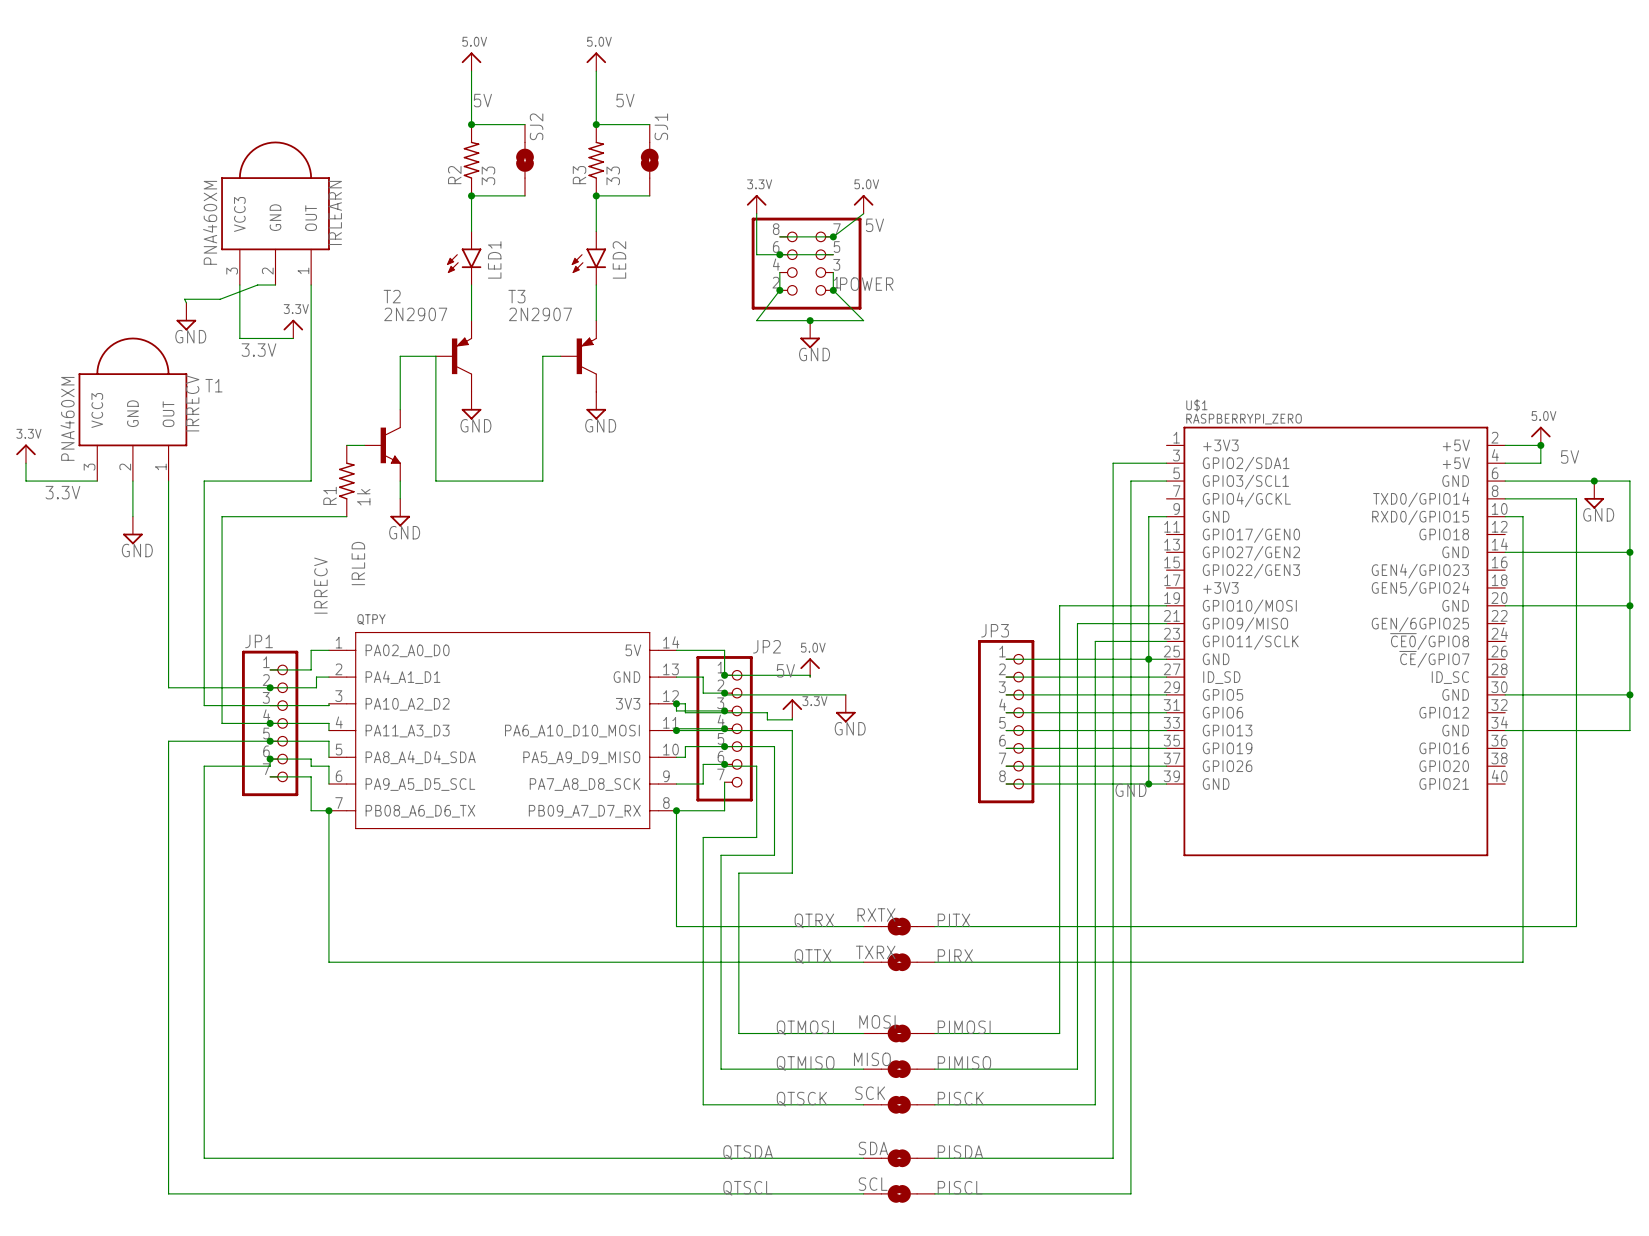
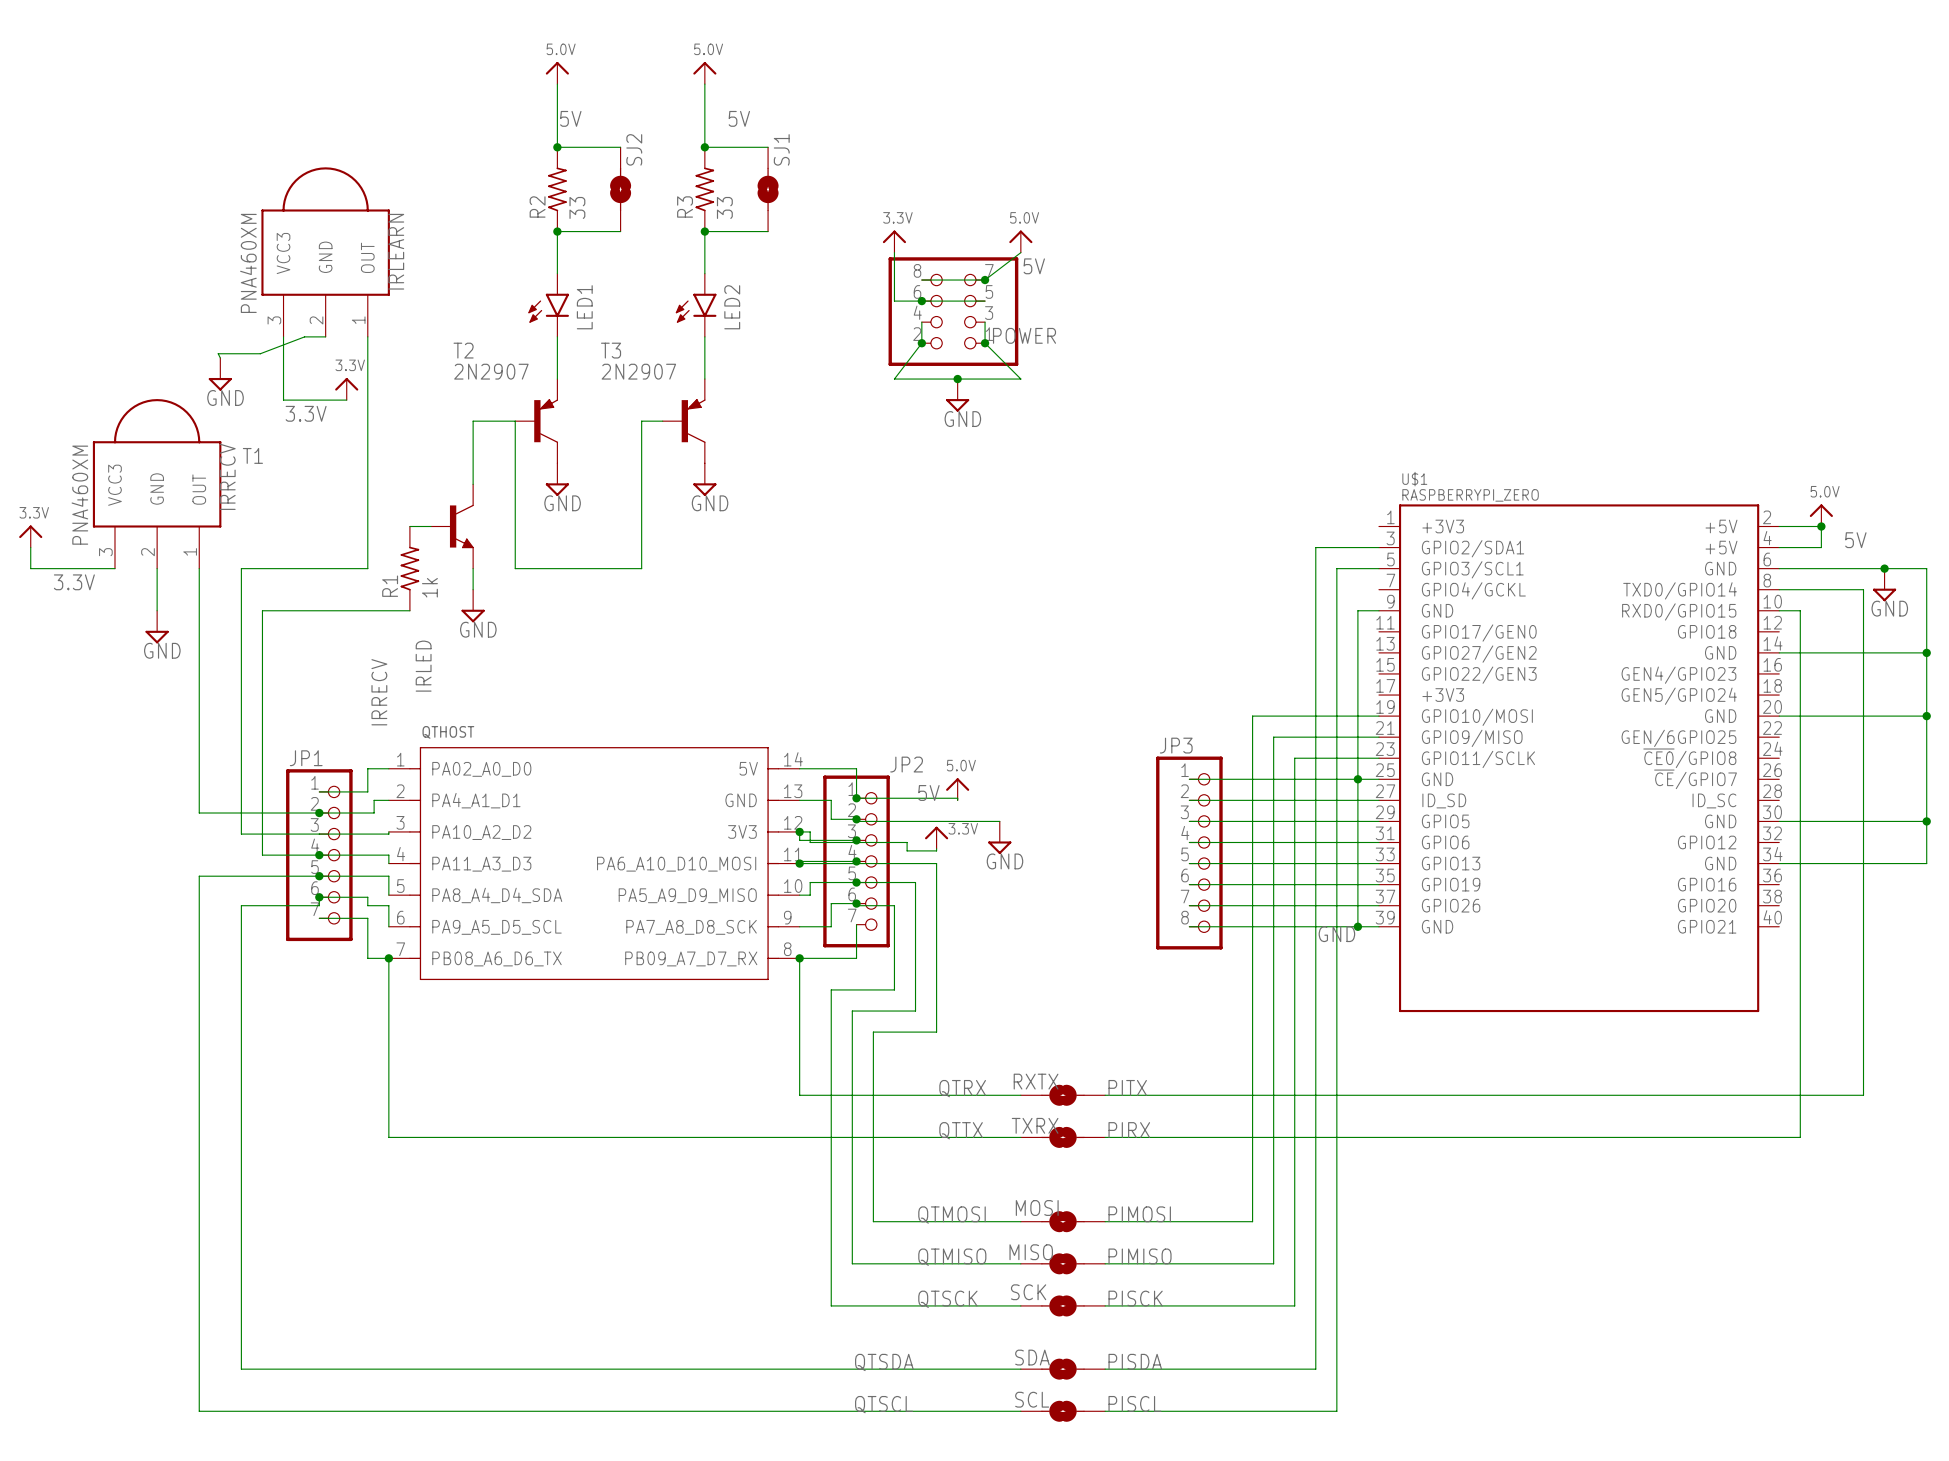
QTPY name: QTPY (371, 619) -> QTHOST (448, 732)

